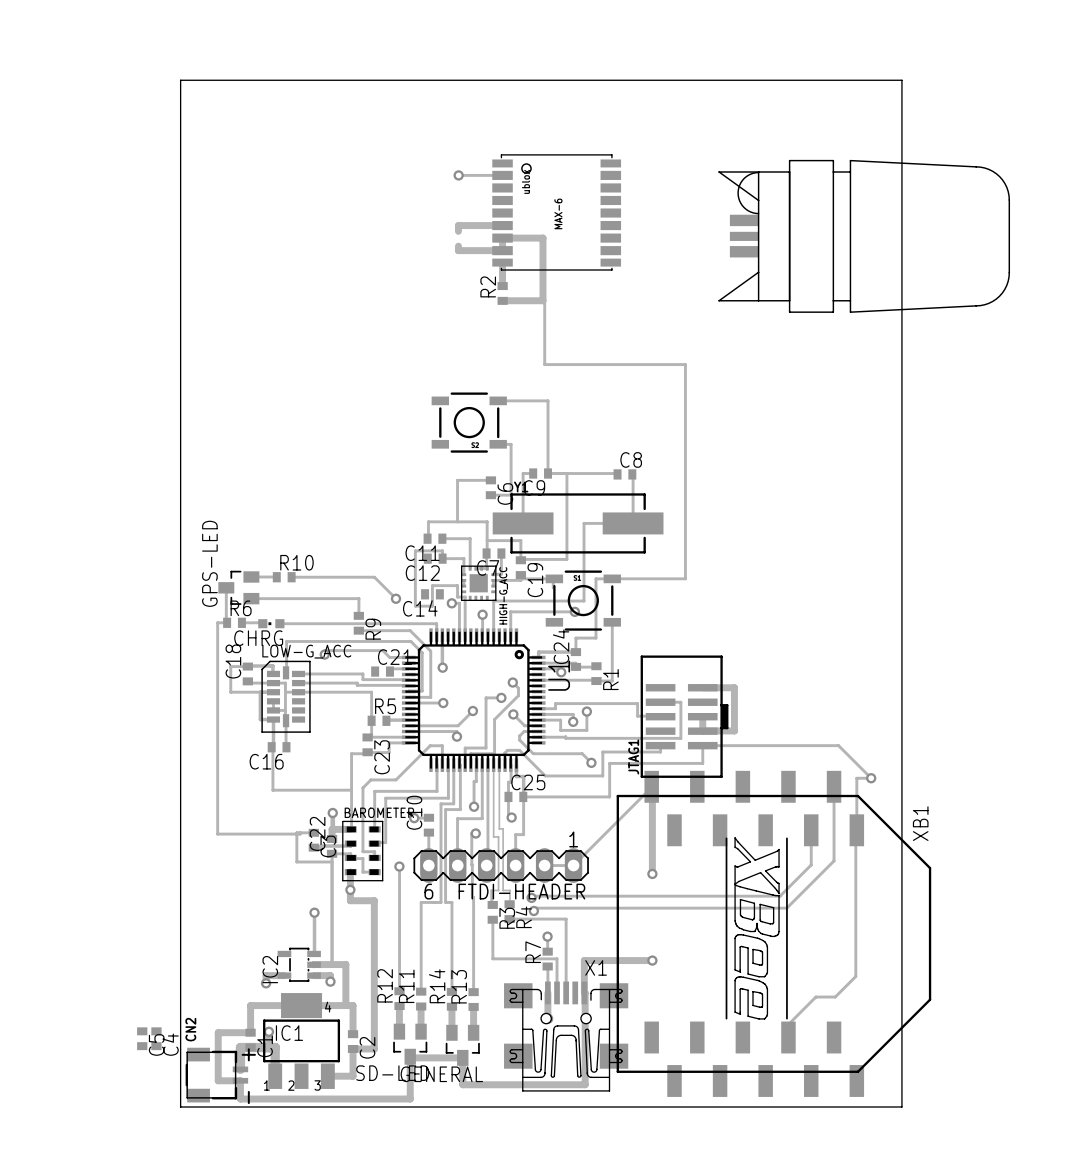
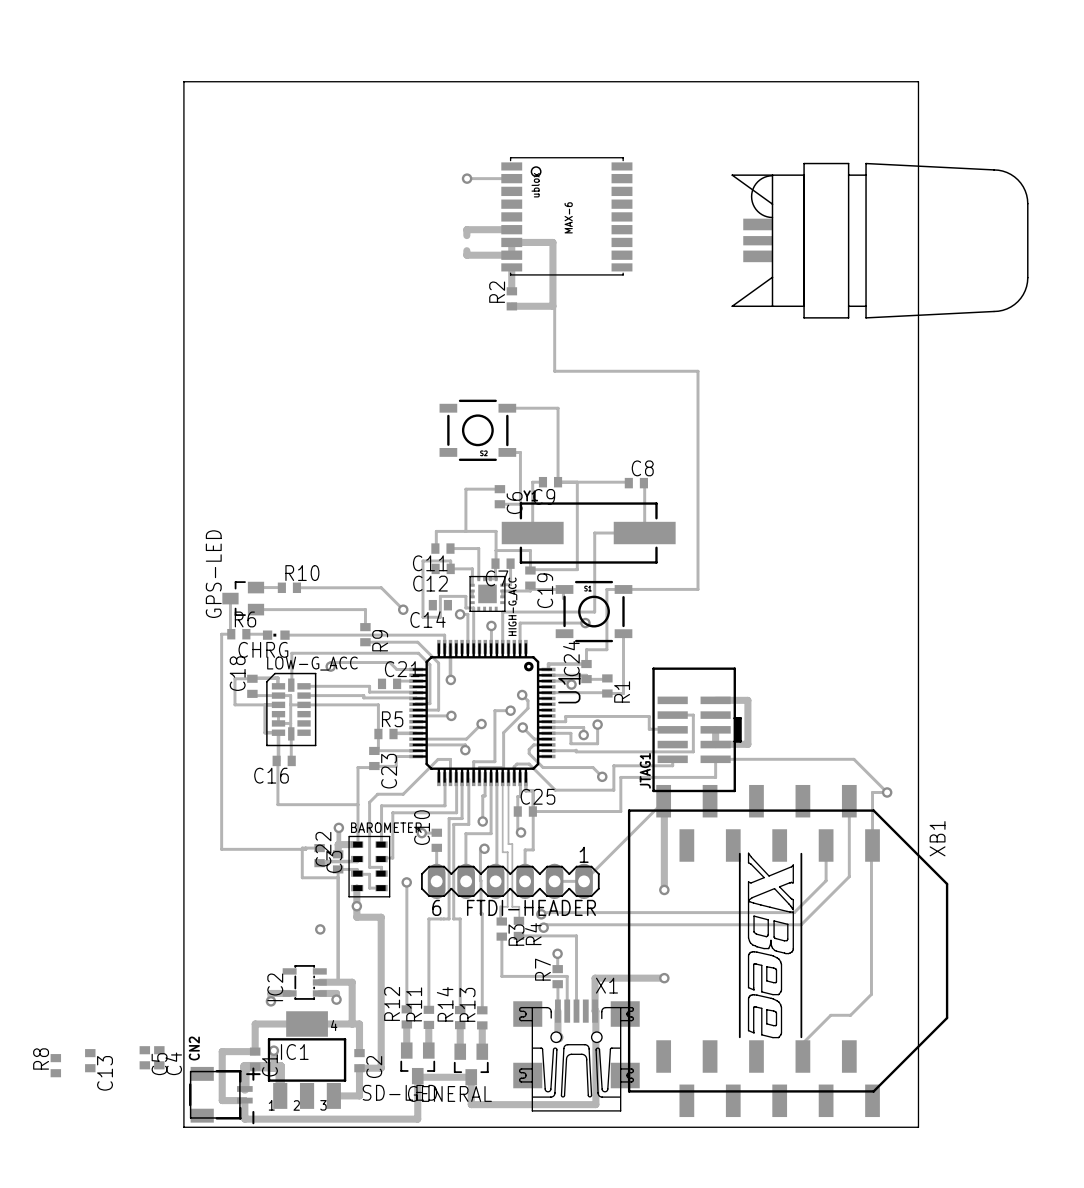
track: (314, 912) (314, 953) -> none
C13: none -> (90, 1060)
R8: none -> (55, 1065)

